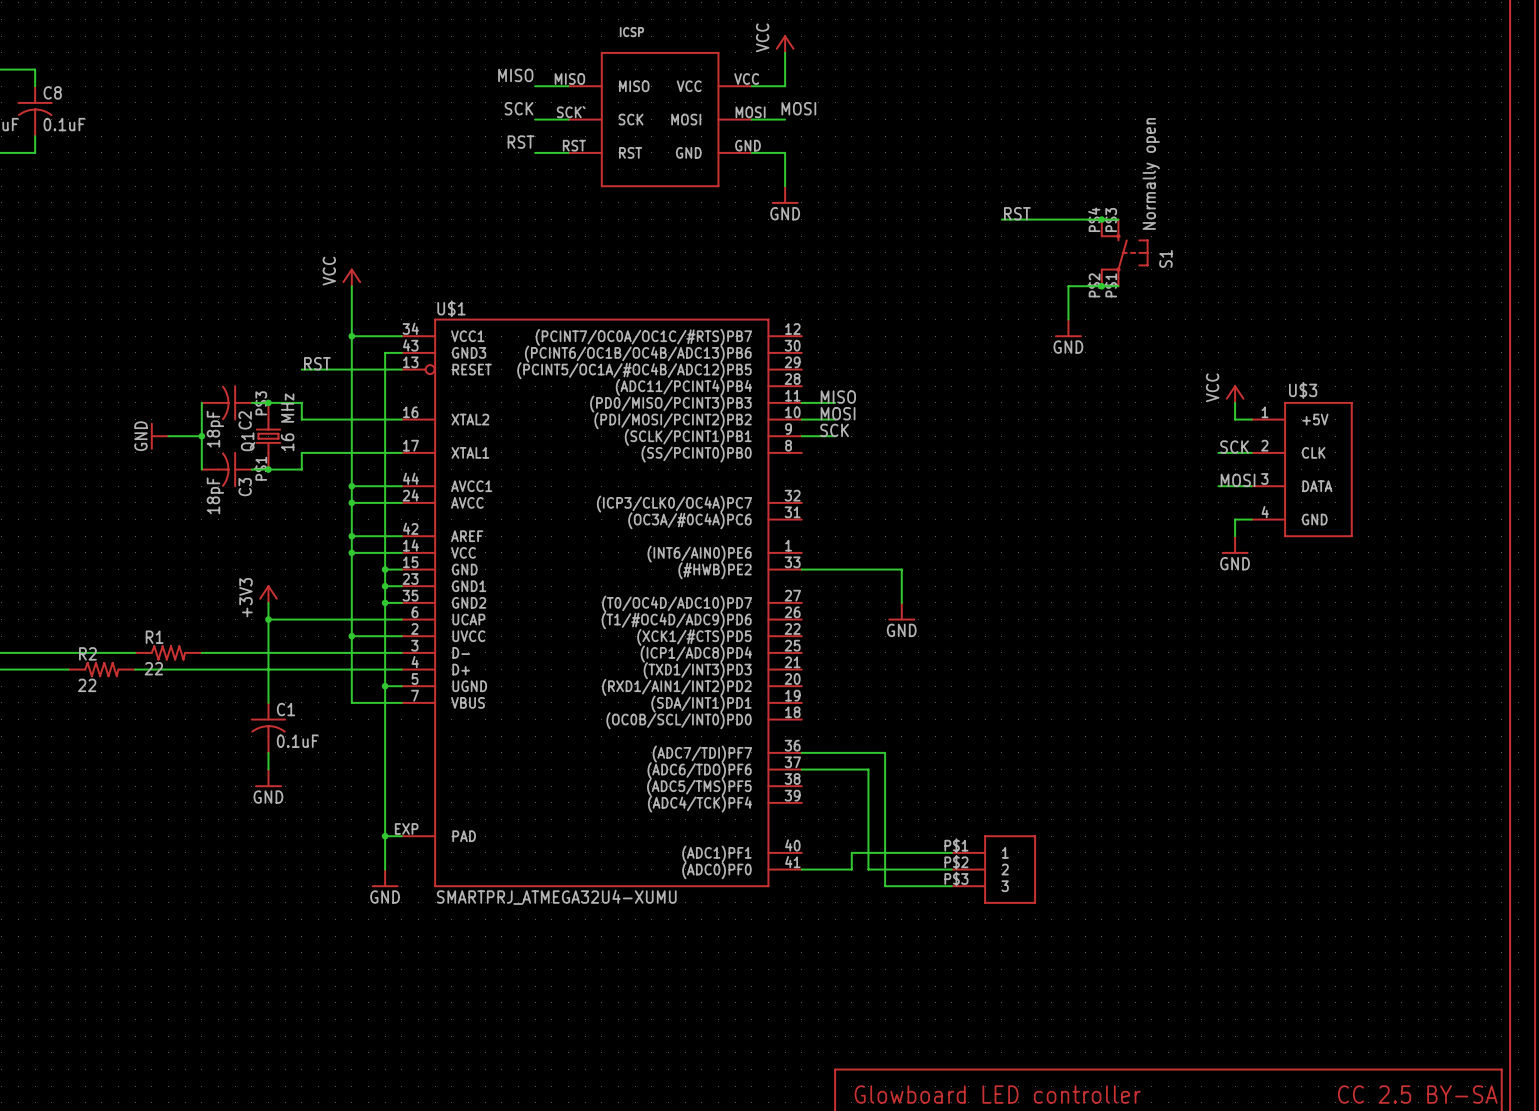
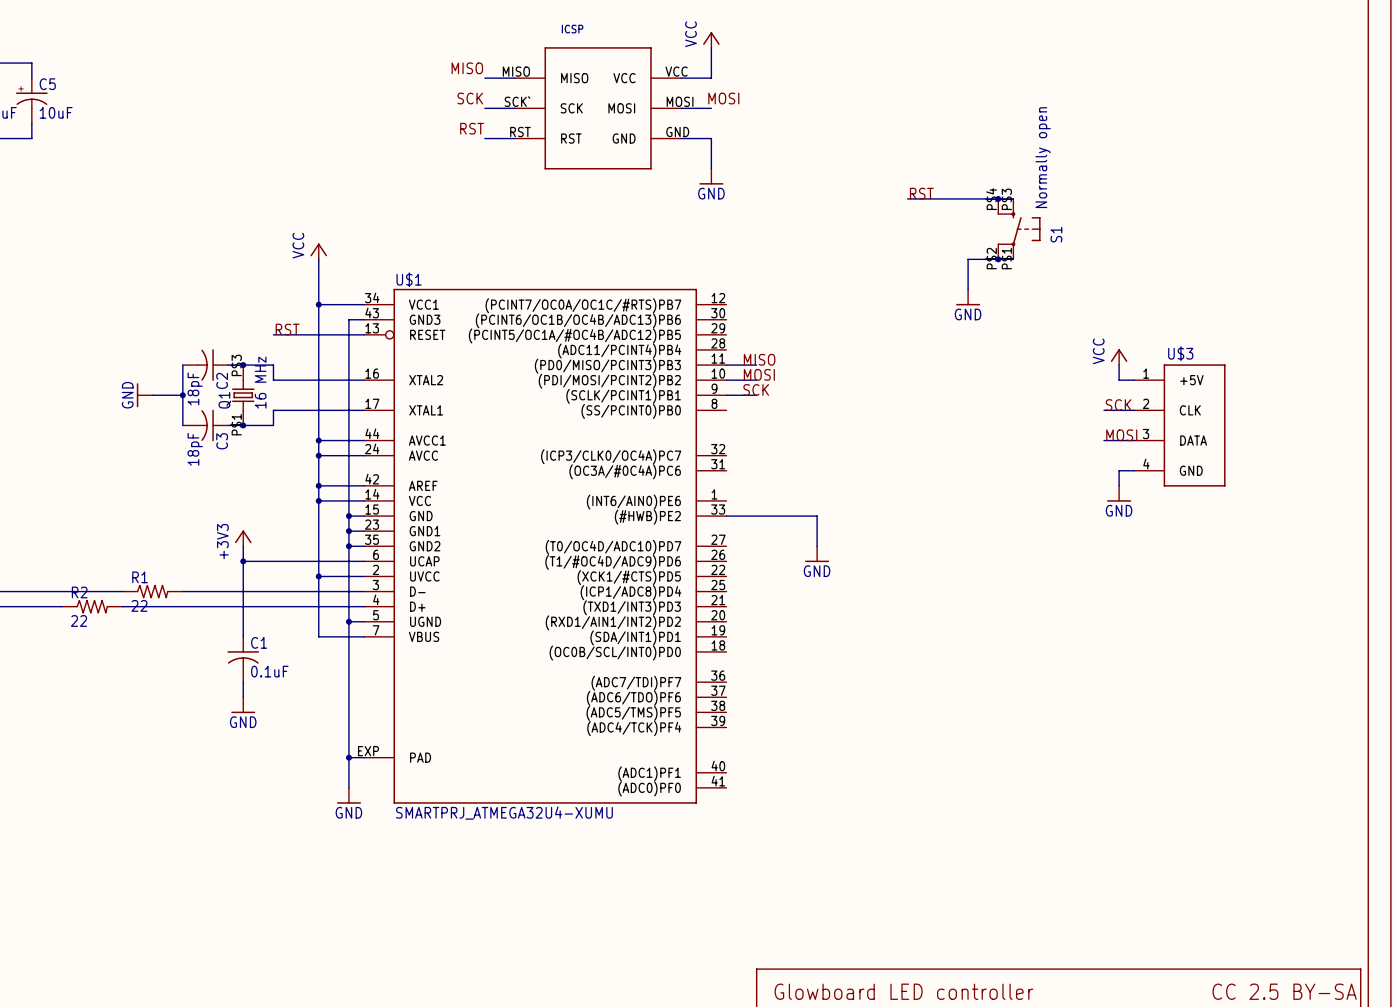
C8: 0.1uF (35, 111) -> none
C5: none -> 10uF (31, 100)
wire: (801, 752) (885, 752) (885, 886) (951, 886) -> none
wire: (801, 769) (868, 769) (868, 869) (951, 869) -> none
wire: (951, 852) (851, 852) (851, 869) (801, 869) -> none
part: (993, 869) -> none

